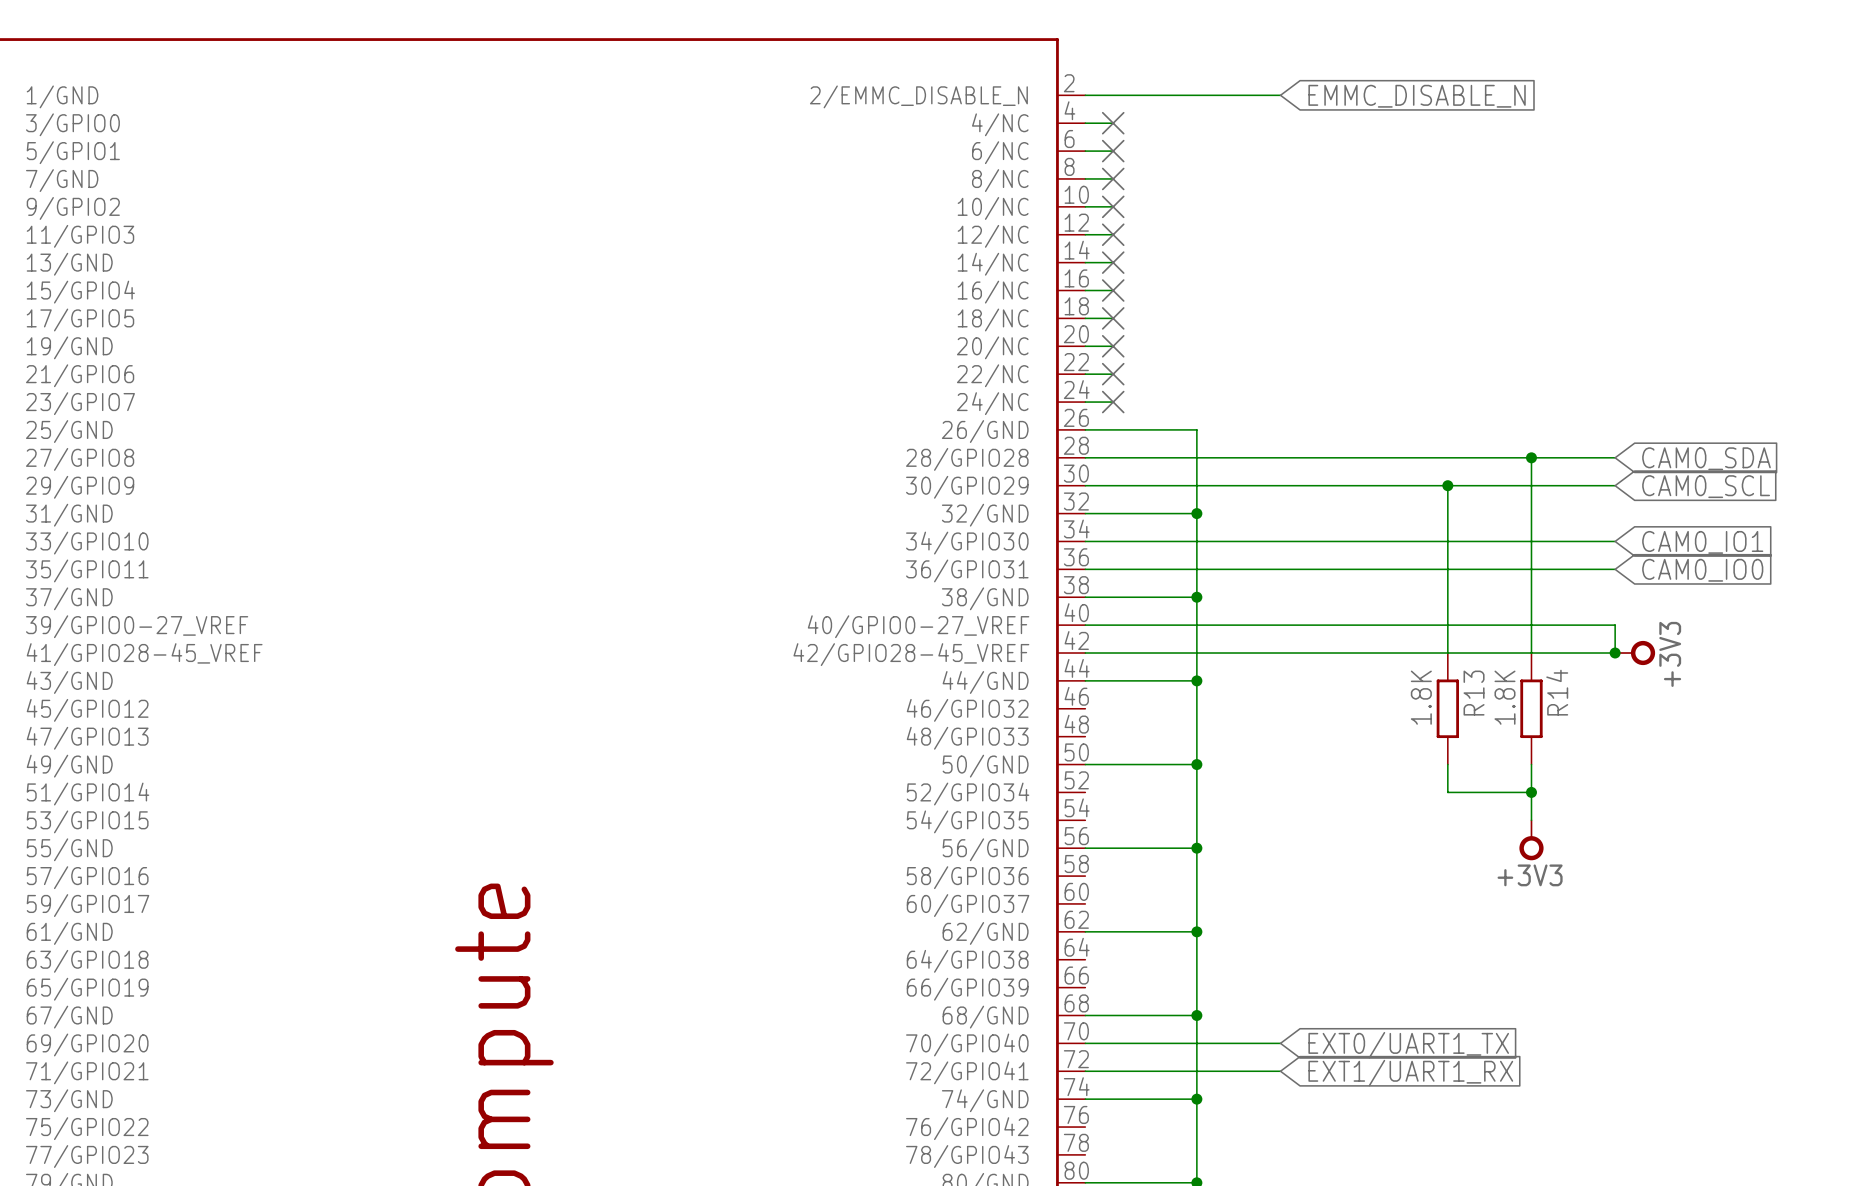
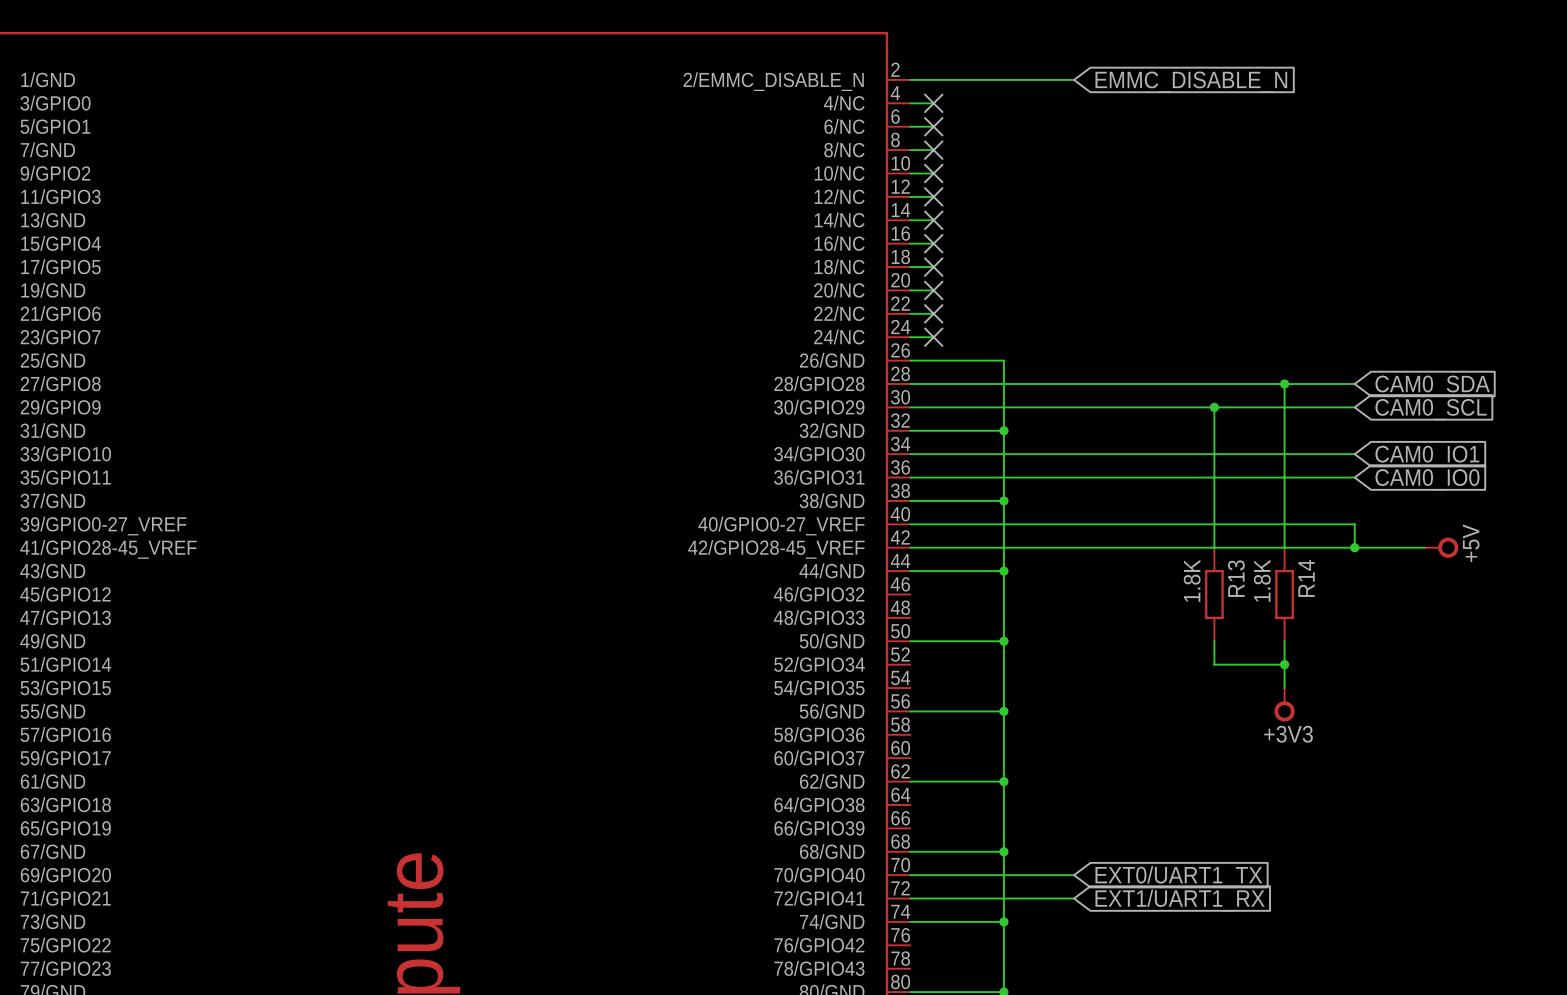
wire: none -> (1354, 547) (1424, 547)
power symbol: +3V3 (1634, 653) -> none
power symbol: none -> +5V (1441, 547)

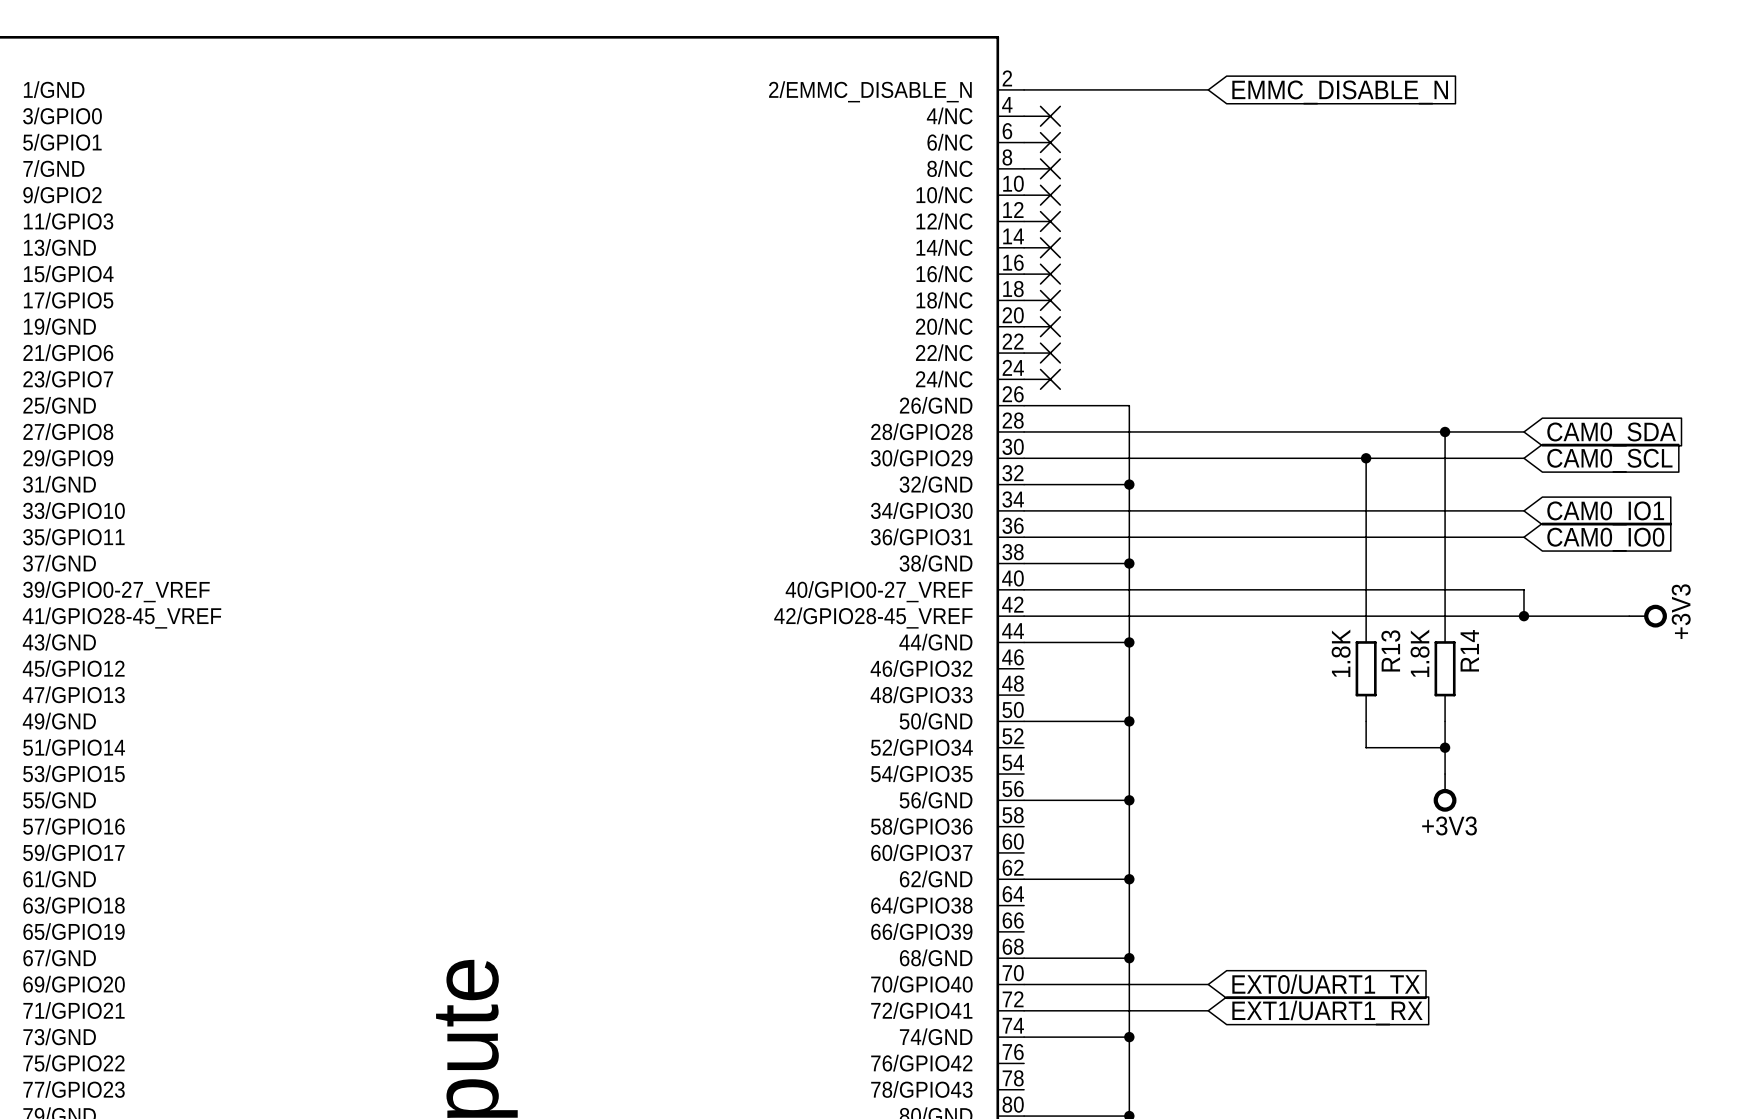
power symbol: +5V (1441, 547) -> none
power symbol: none -> +3V3 (1647, 616)

